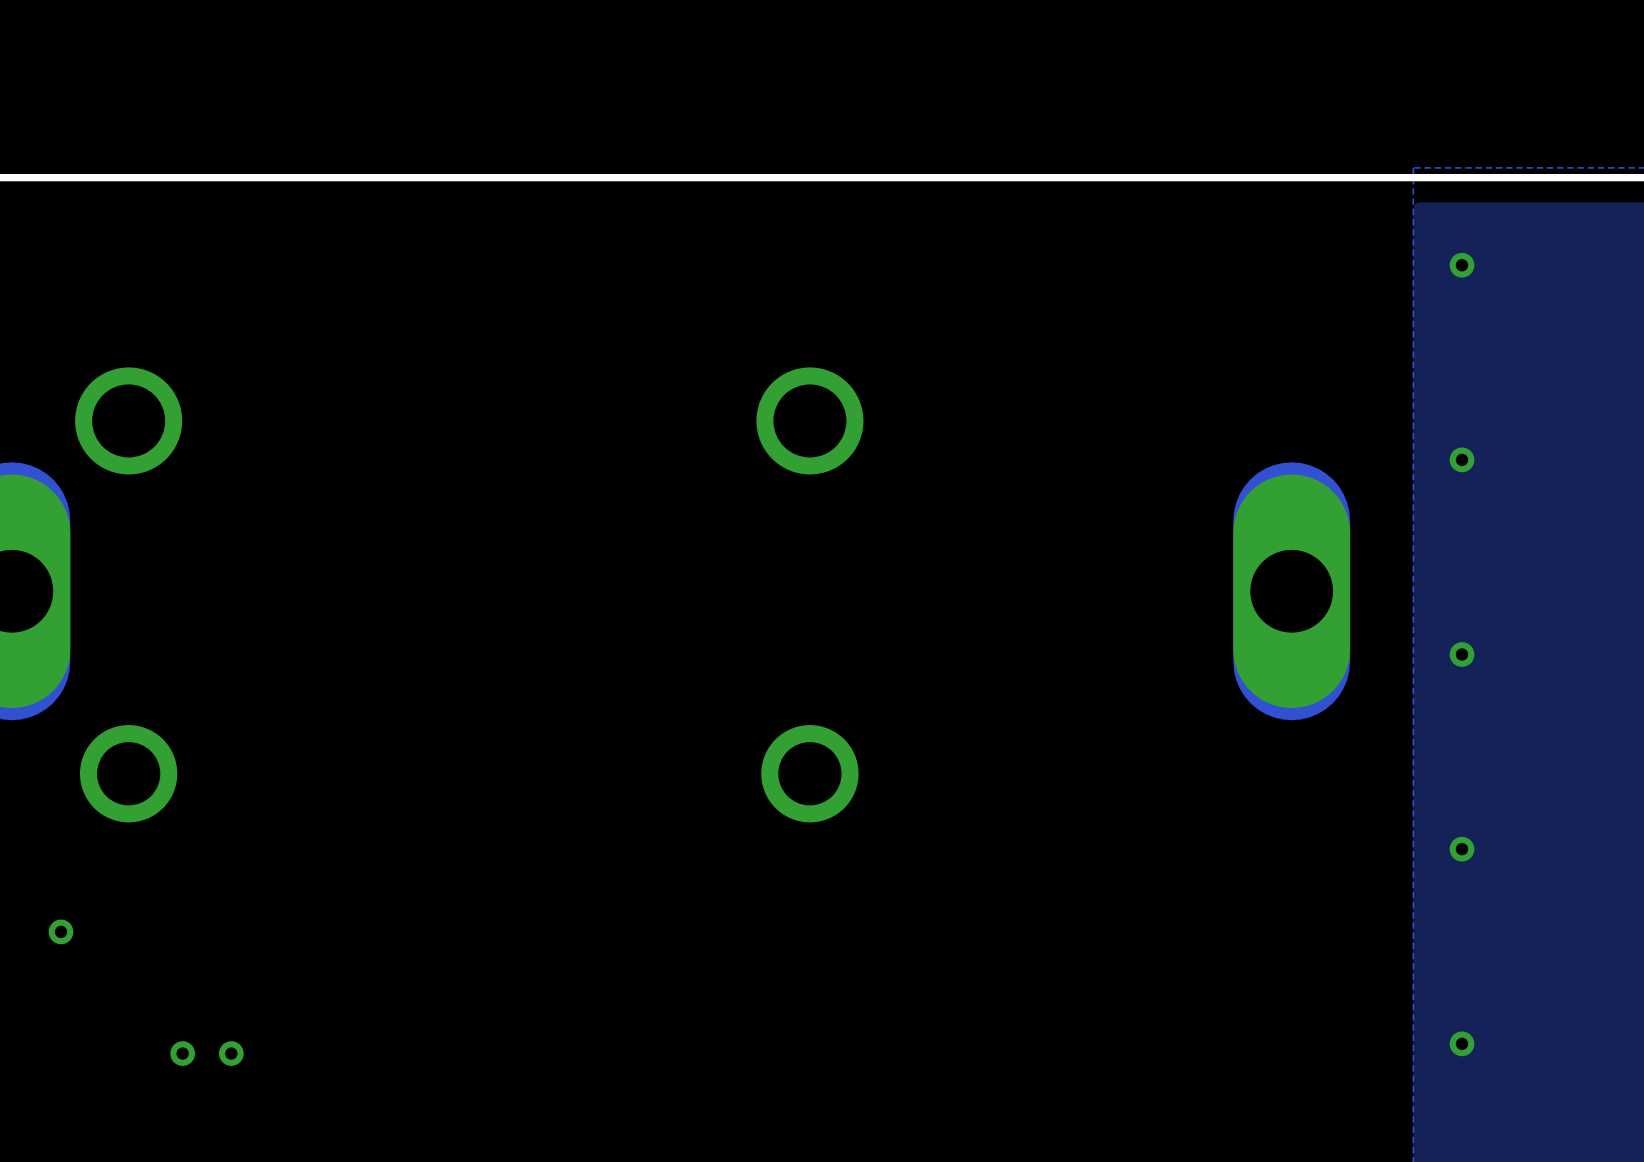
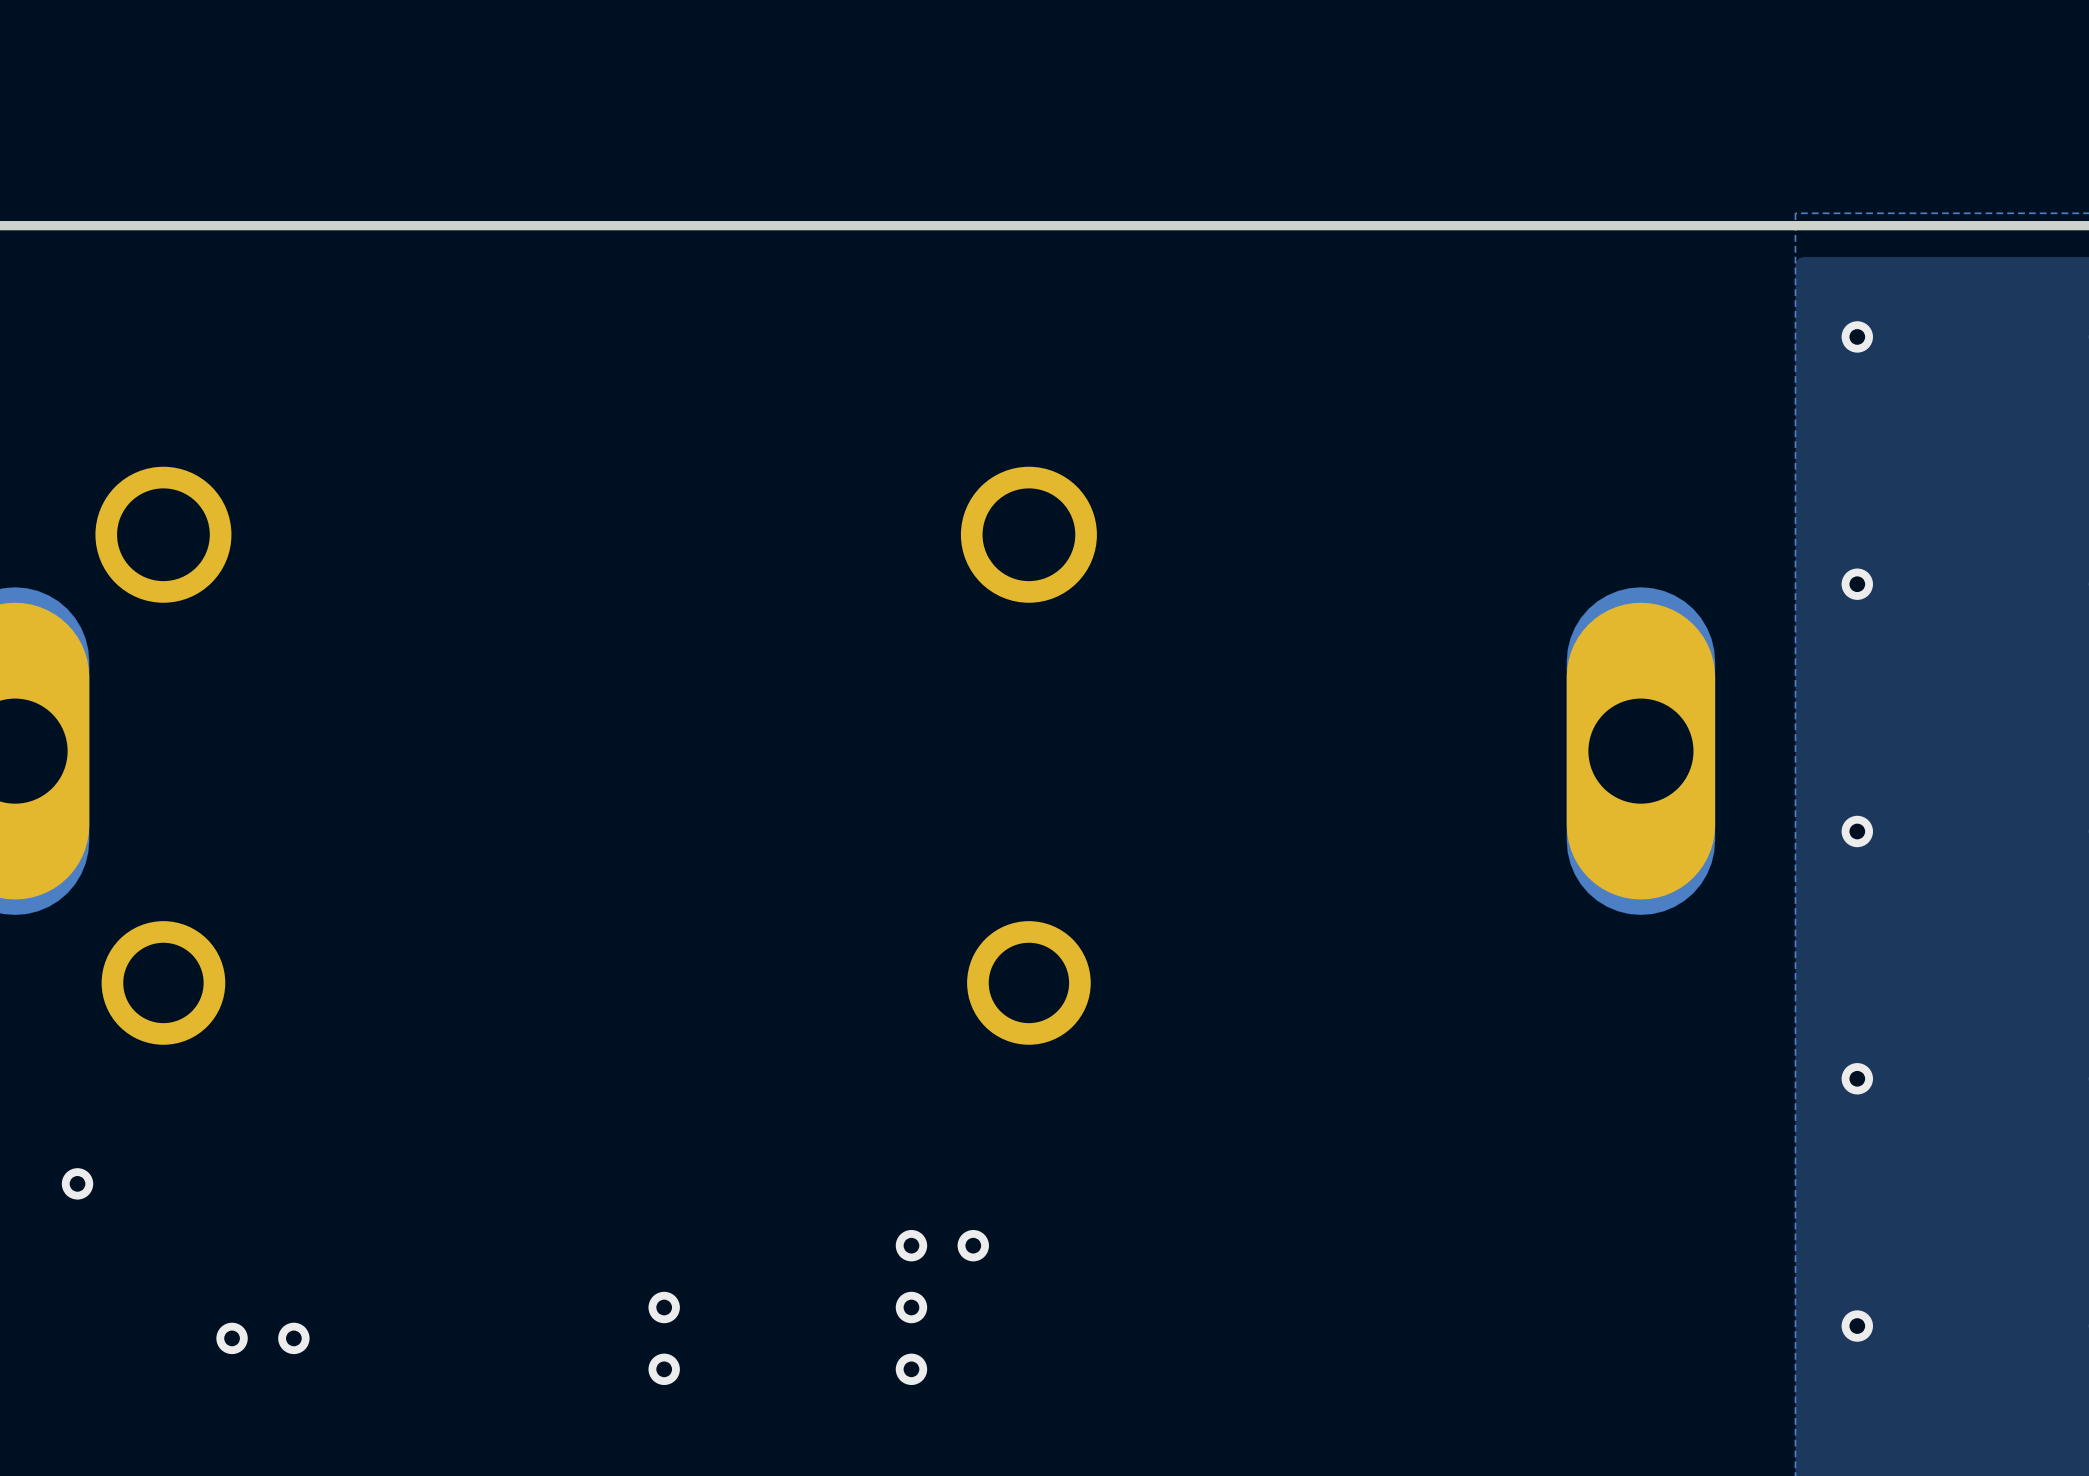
via: none -> (911, 1245)
via: none -> (973, 1245)
via: none -> (664, 1307)
via: none -> (911, 1307)
via: none -> (664, 1369)
via: none -> (911, 1369)

